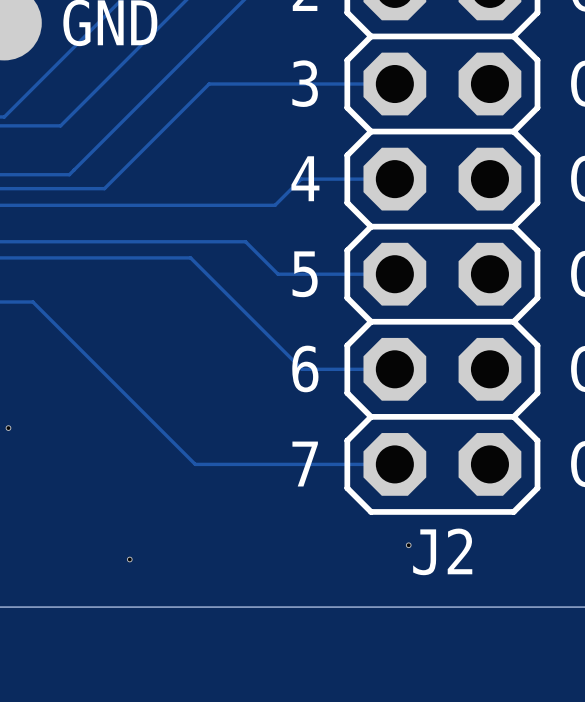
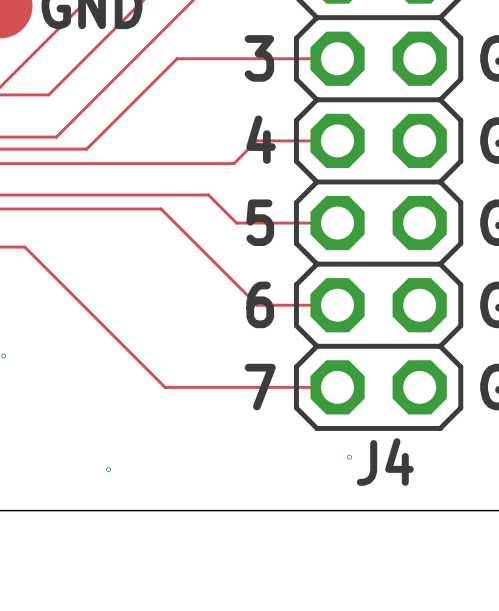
J2 name: J2 (442, 551) -> J4 (385, 461)

